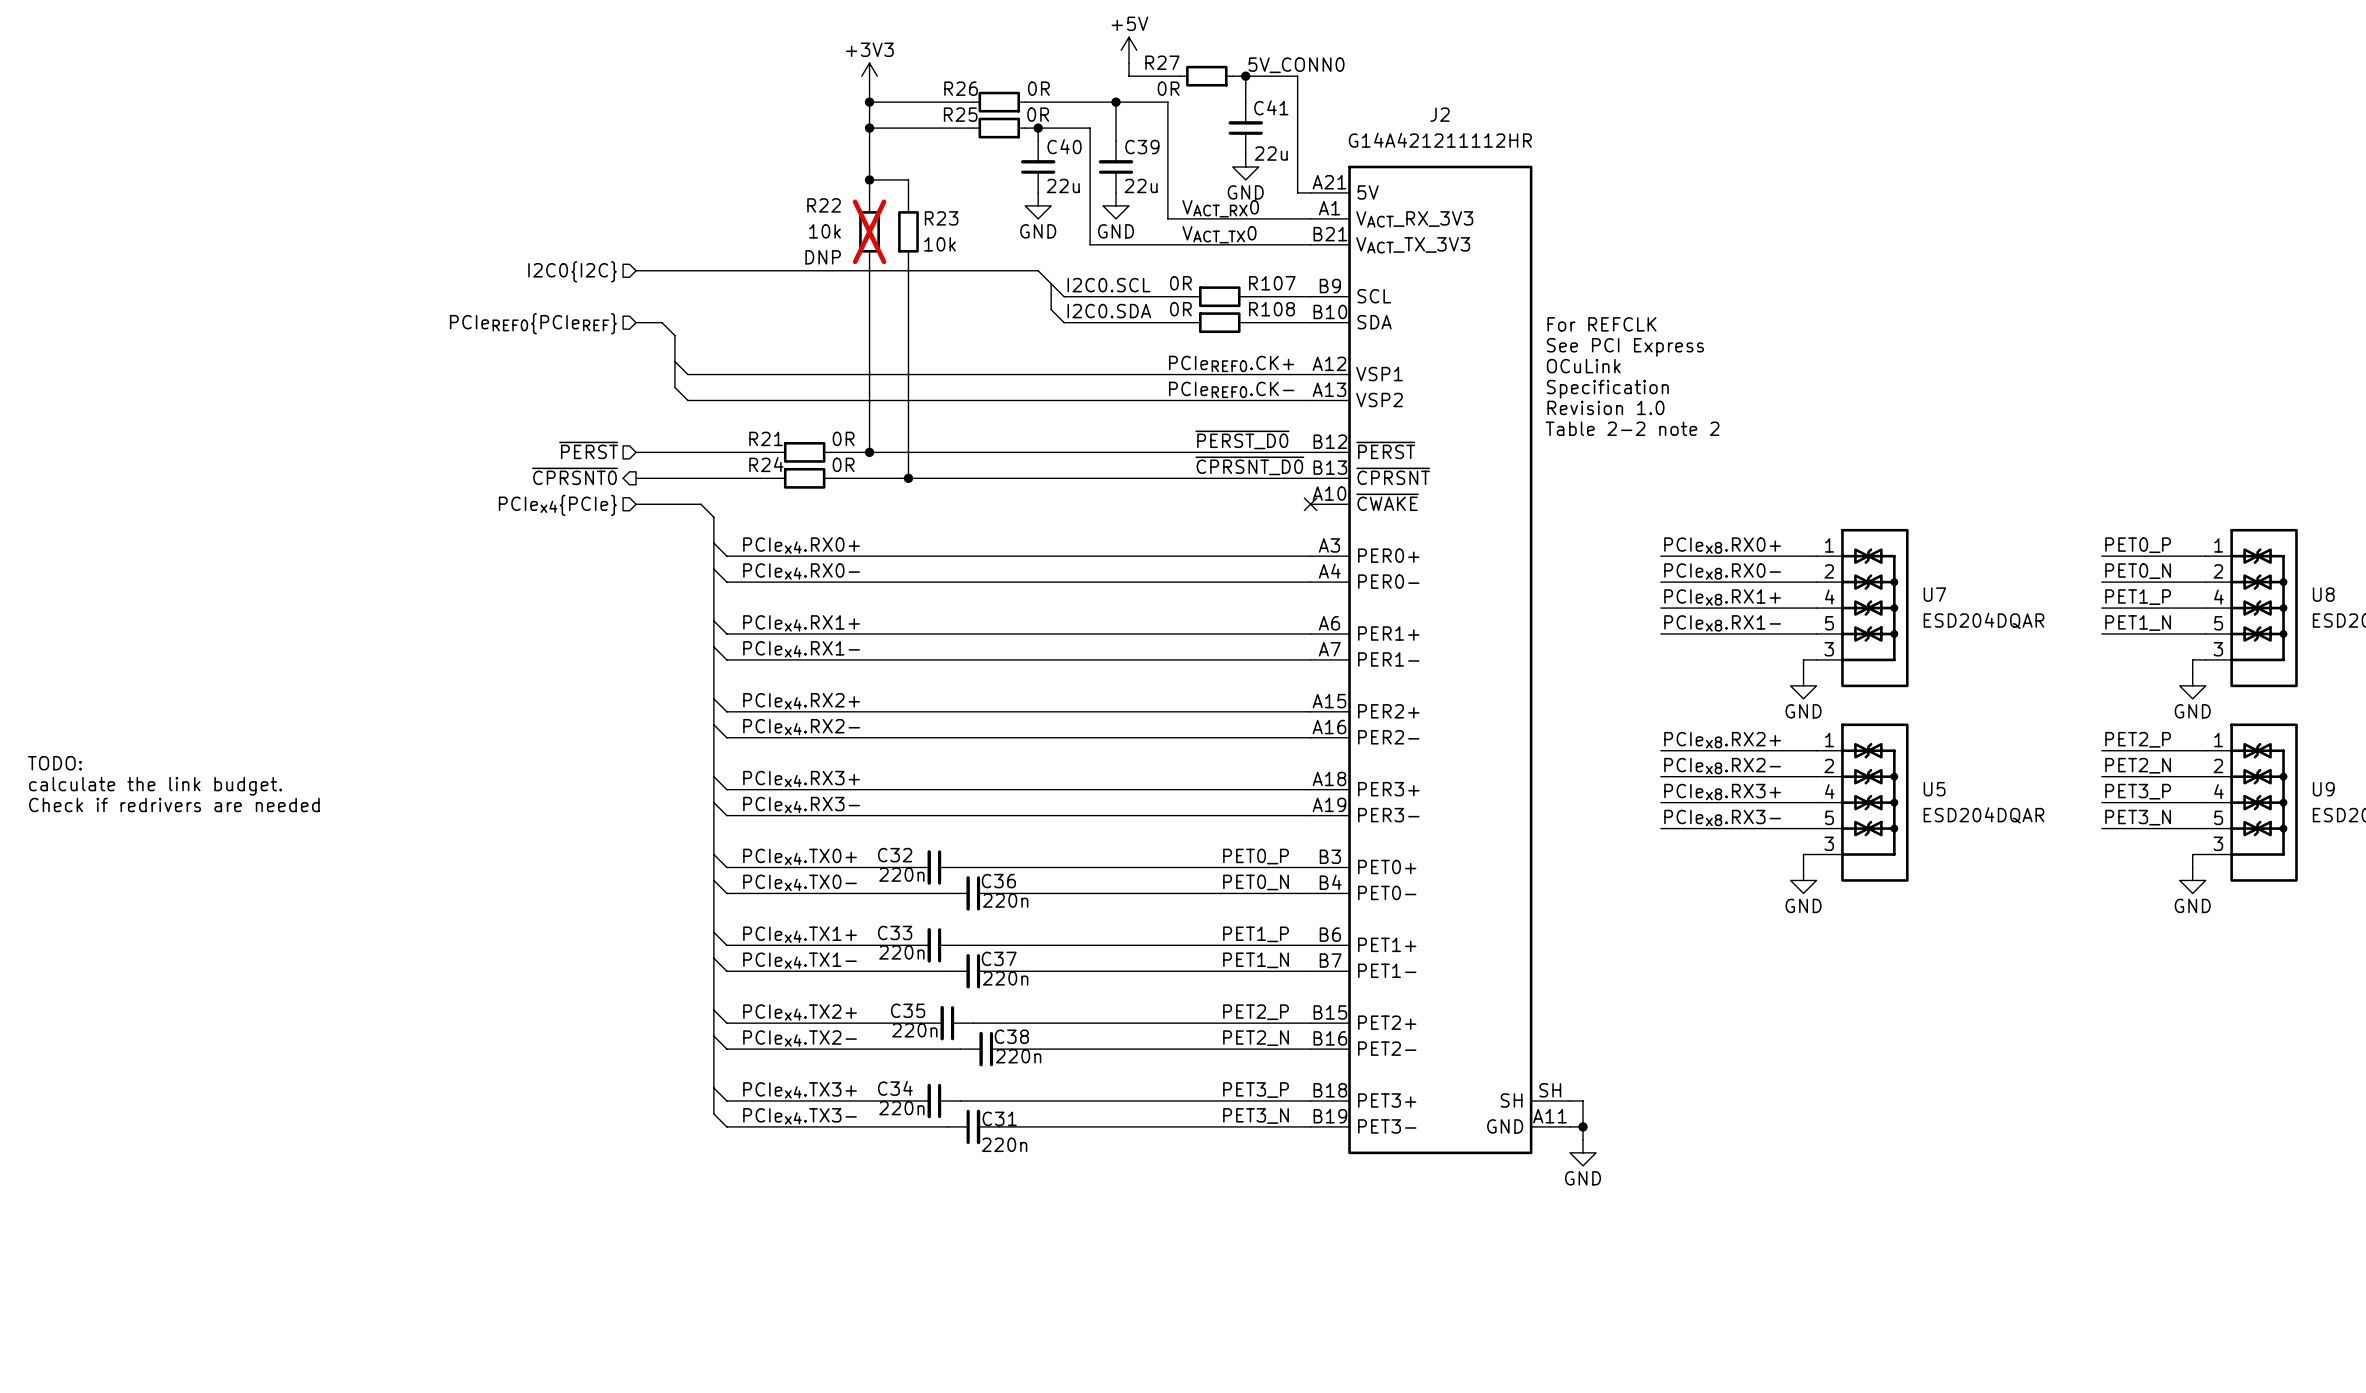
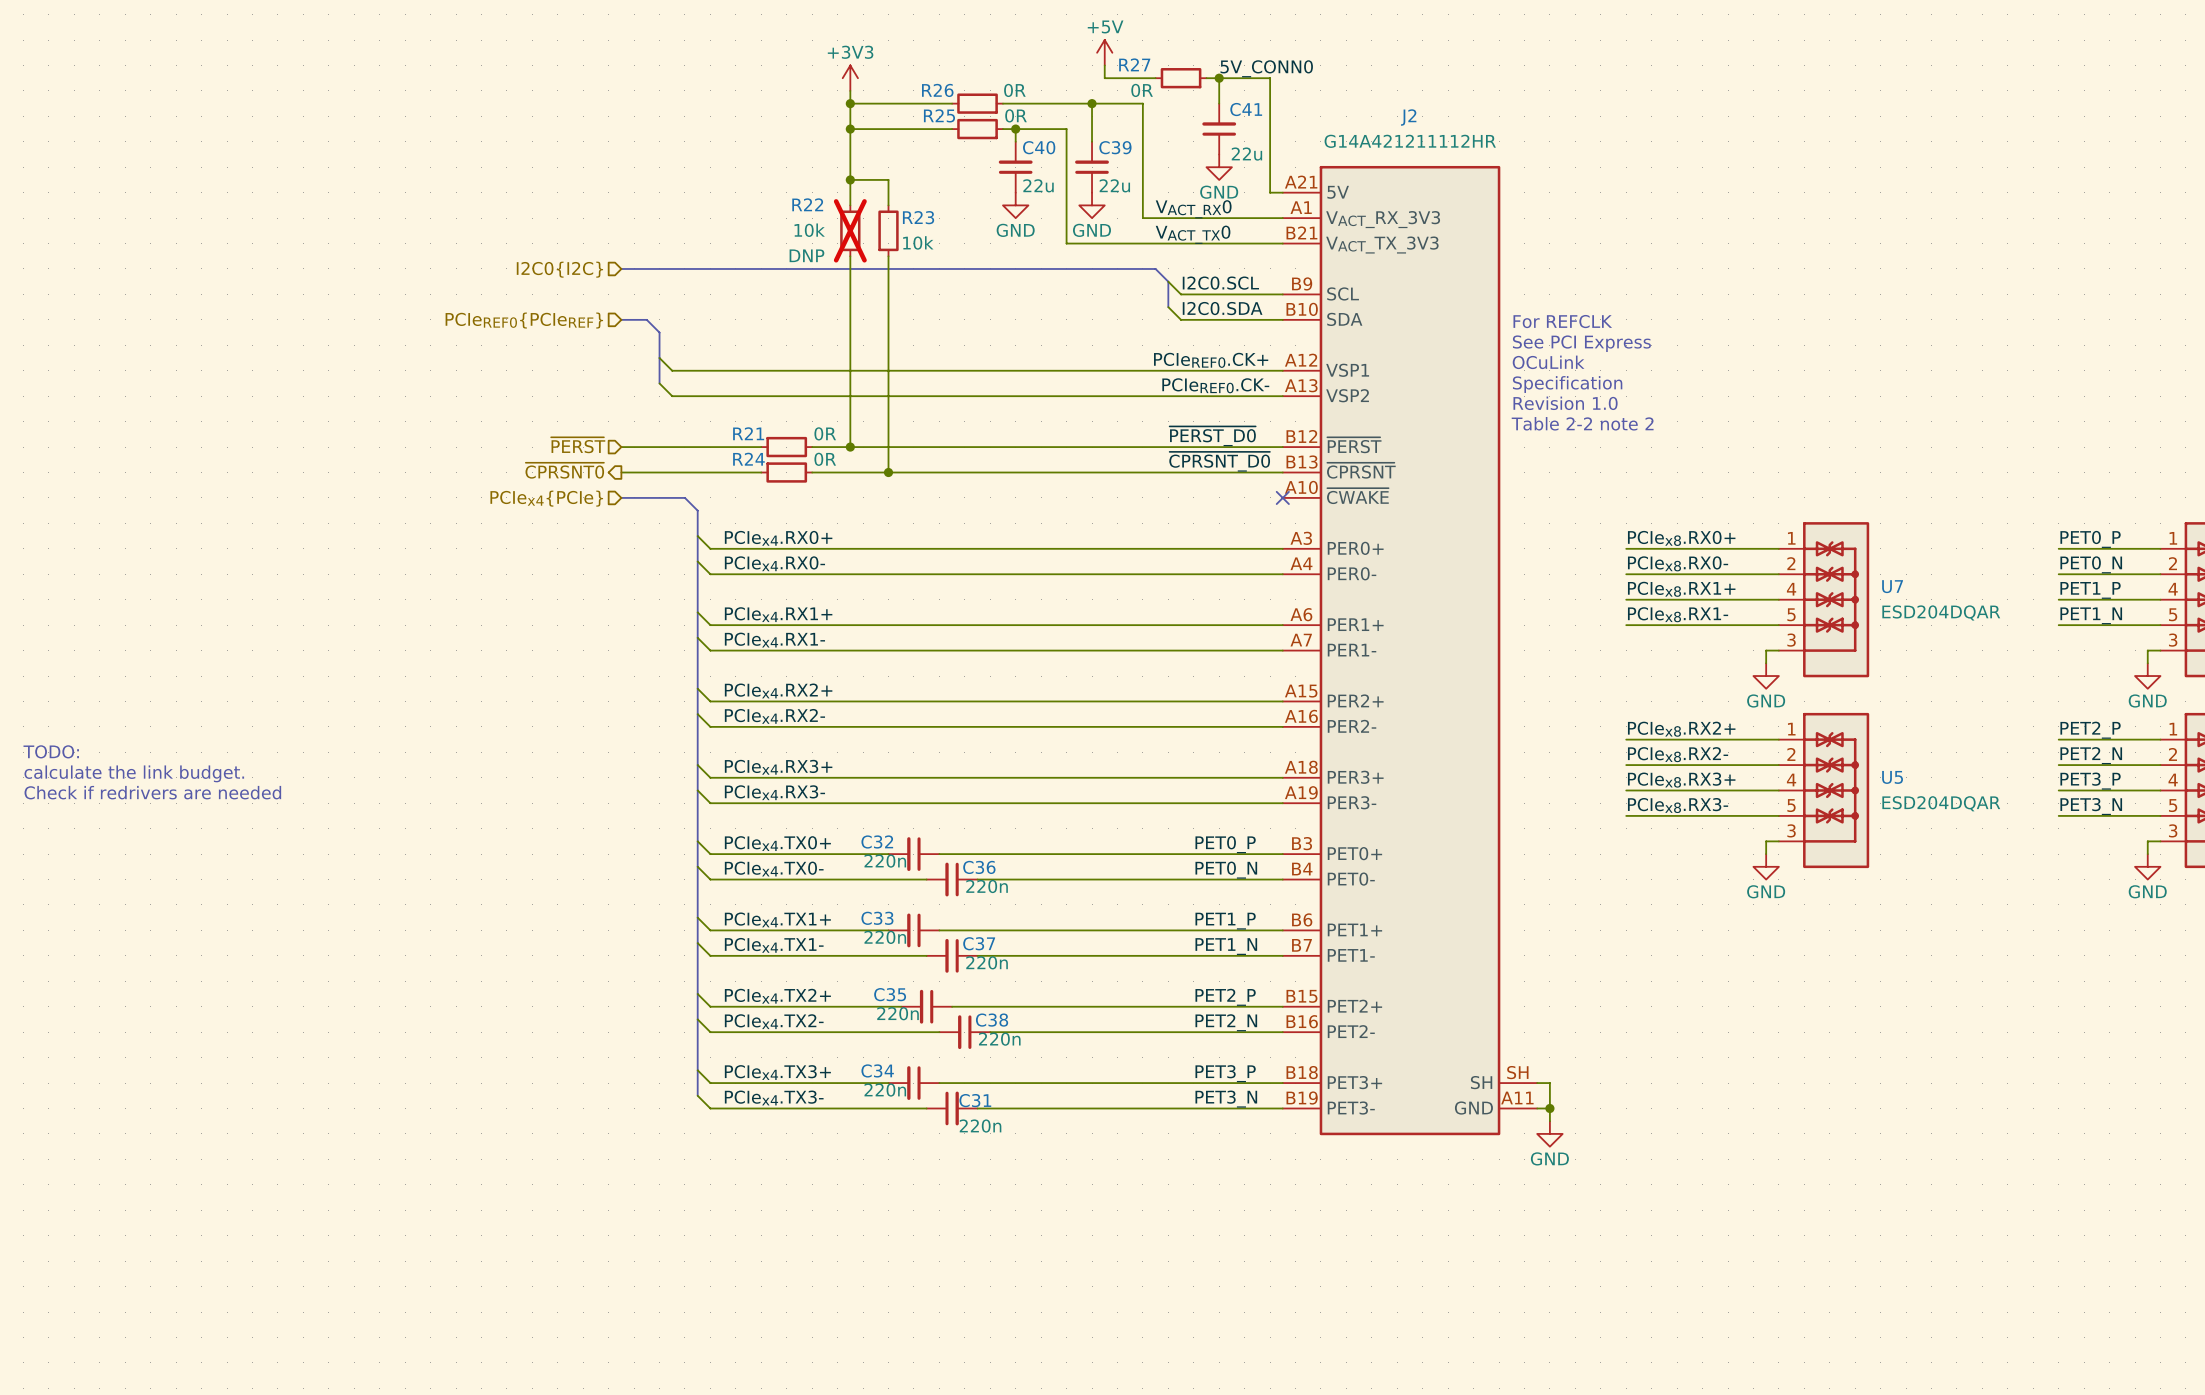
bus: (1038, 270) (1051, 283) (1051, 309) -> (1015, 268) (1155, 268) (1168, 281) (1168, 307)
wire: (1051, 283) (1064, 296) (1193, 296) -> none
wire: none -> (1168, 281) (1181, 294) (1219, 294)
label position: I2C0.SCL (1109, 285) -> I2C0.SCL (1220, 283)
R107: (1219, 296) -> none
wire: (1051, 309) (1064, 322) (1193, 322) -> none
wire: none -> (1168, 307) (1181, 319) (1219, 319)
label position: I2C0.SDA (1109, 311) -> I2C0.SDA (1222, 308)
R108: (1219, 322) -> none

